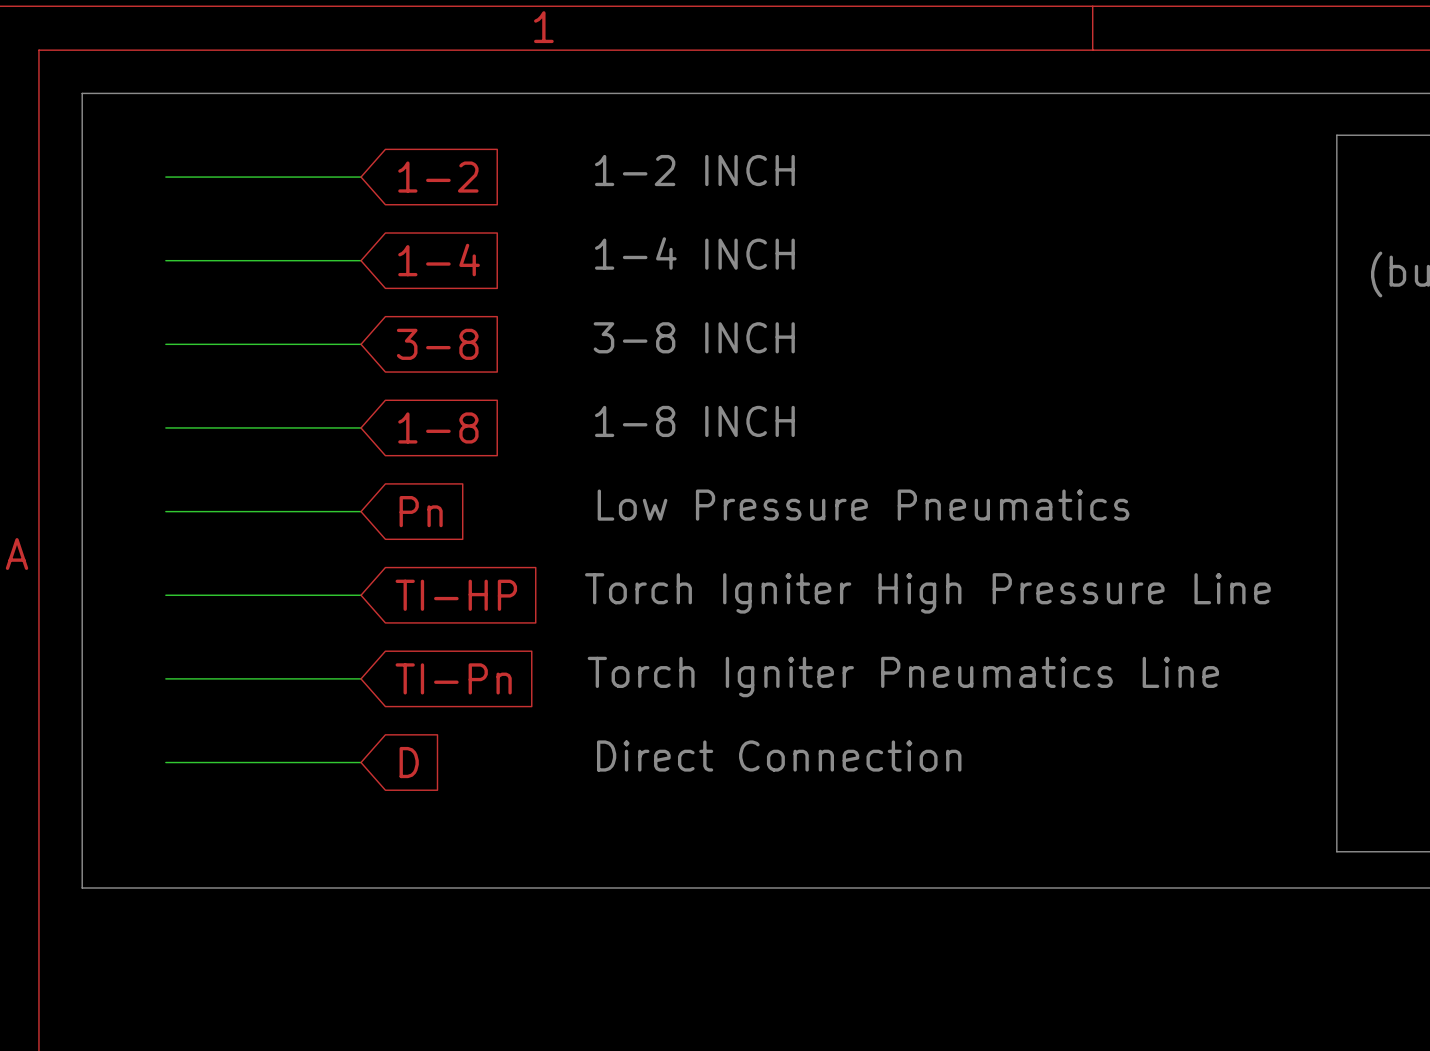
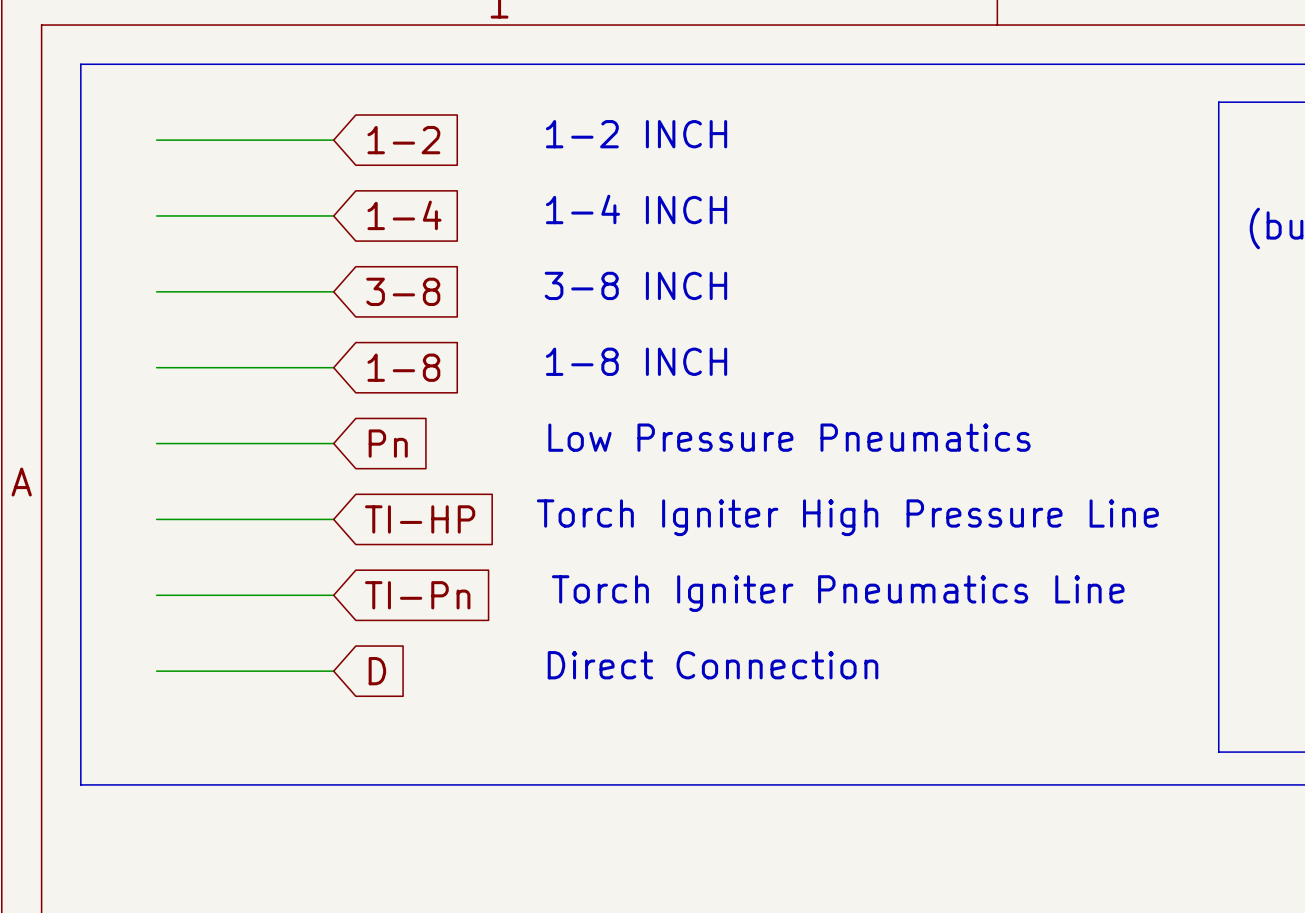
text position: Torch Igniter Pneumatics Line (903, 677) -> Torch Igniter Pneumatics Line (838, 593)

